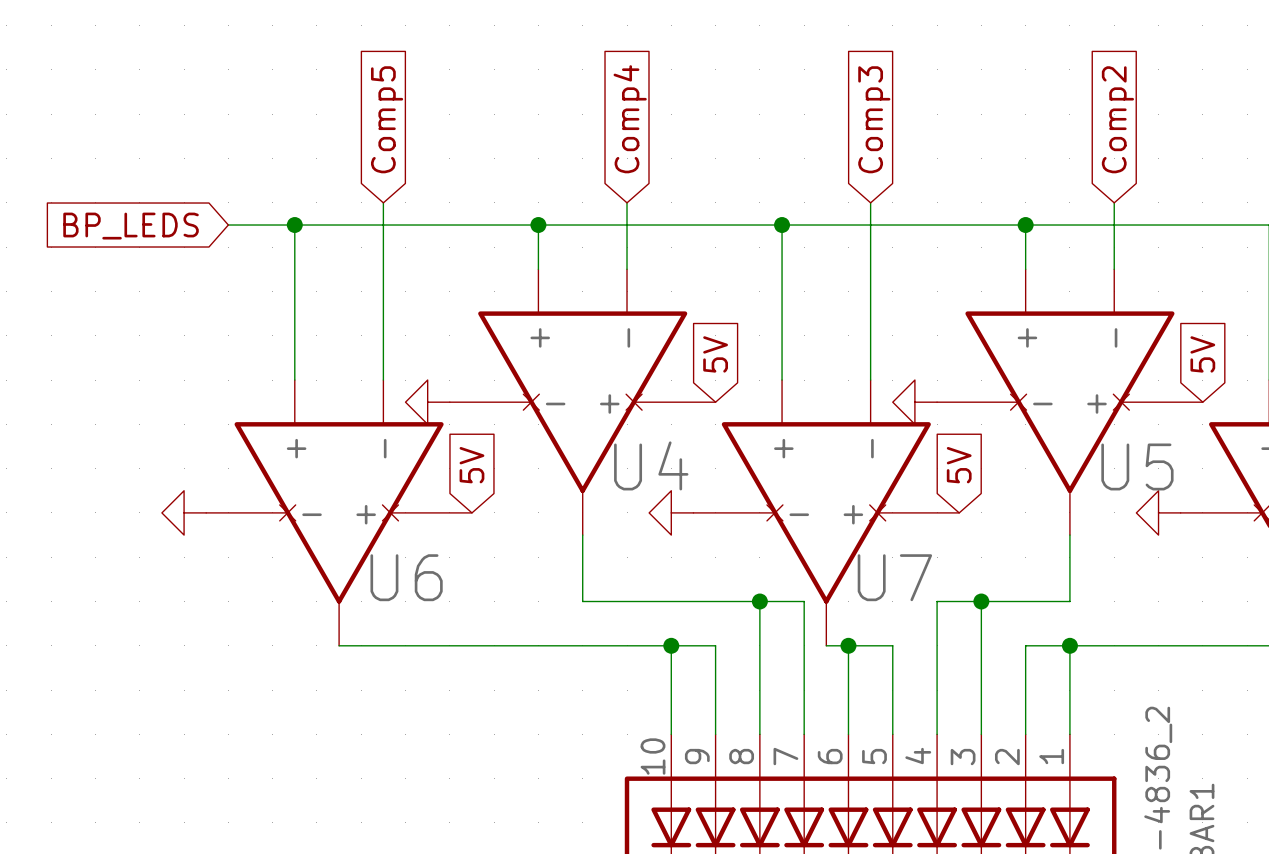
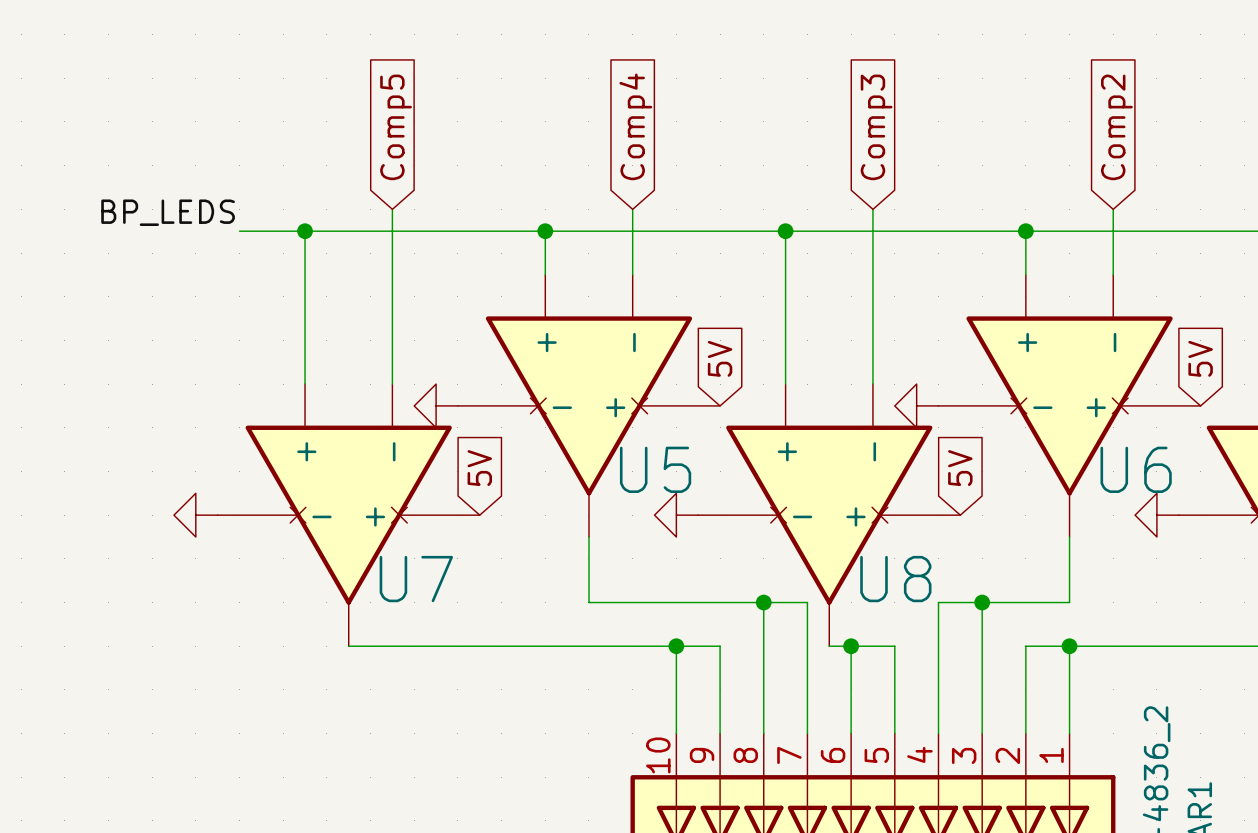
label: none -> BP_LEDS (168, 212)
global label: BP_LEDS (131, 226) -> none
U4 name: U4 (651, 465) -> U5 (655, 469)
U5 name: U5 (1137, 466) -> U6 (1136, 469)
U6 name: U6 (406, 577) -> U7 (416, 579)
U7 name: U7 (894, 577) -> U8 (895, 579)

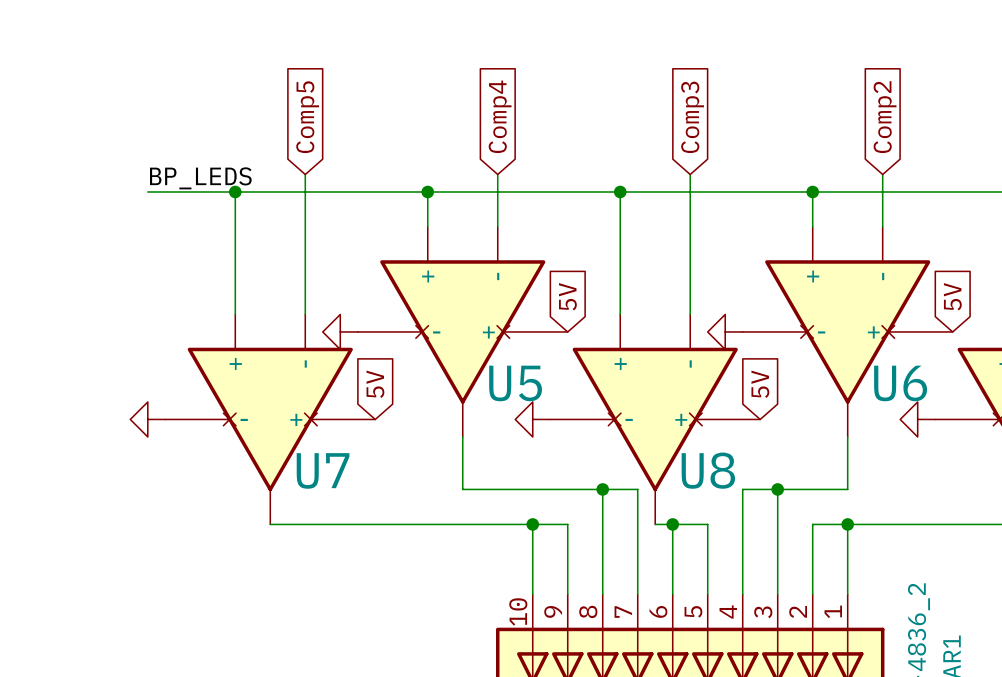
label position: BP_LEDS (168, 212) -> BP_LEDS (200, 178)
wire: none -> (147, 192) (182, 192)

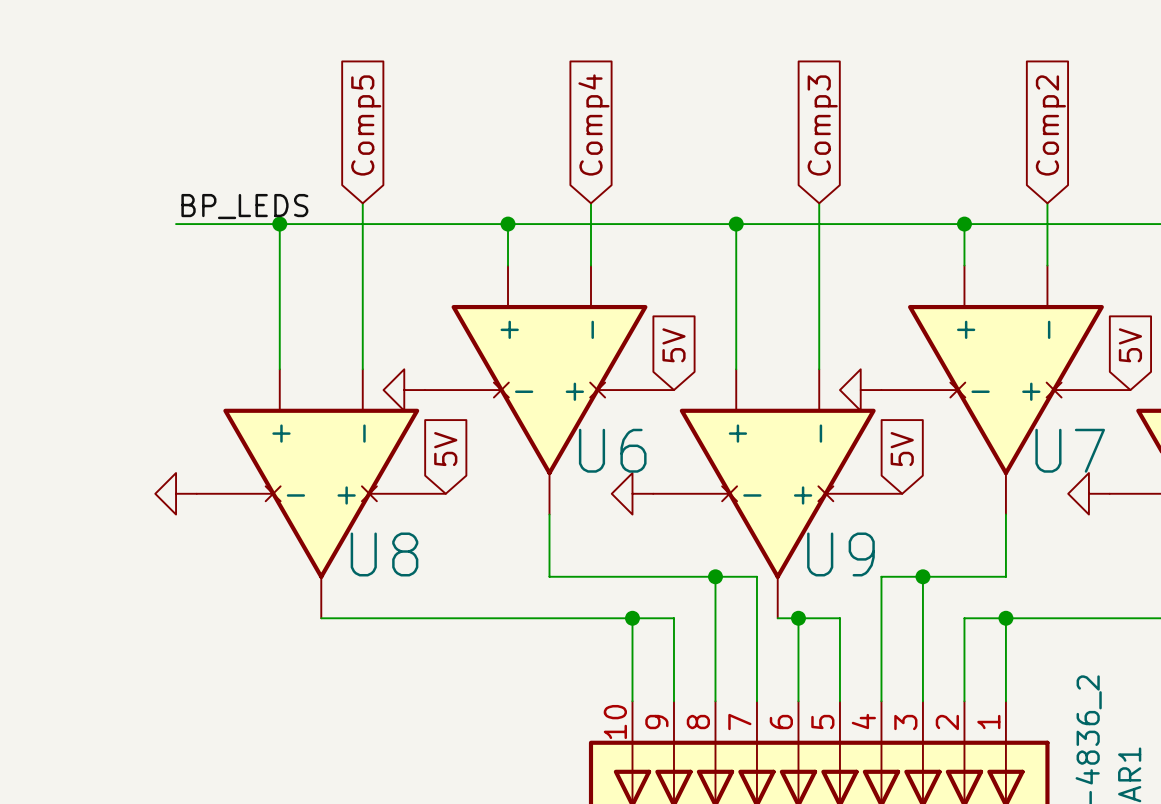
U5 name: U5 (515, 383) -> U6 (612, 450)
U6 name: U6 (900, 383) -> U7 (1070, 450)
U7 name: U7 (323, 470) -> U8 (384, 554)
U8 name: U8 (708, 470) -> U9 (840, 554)

